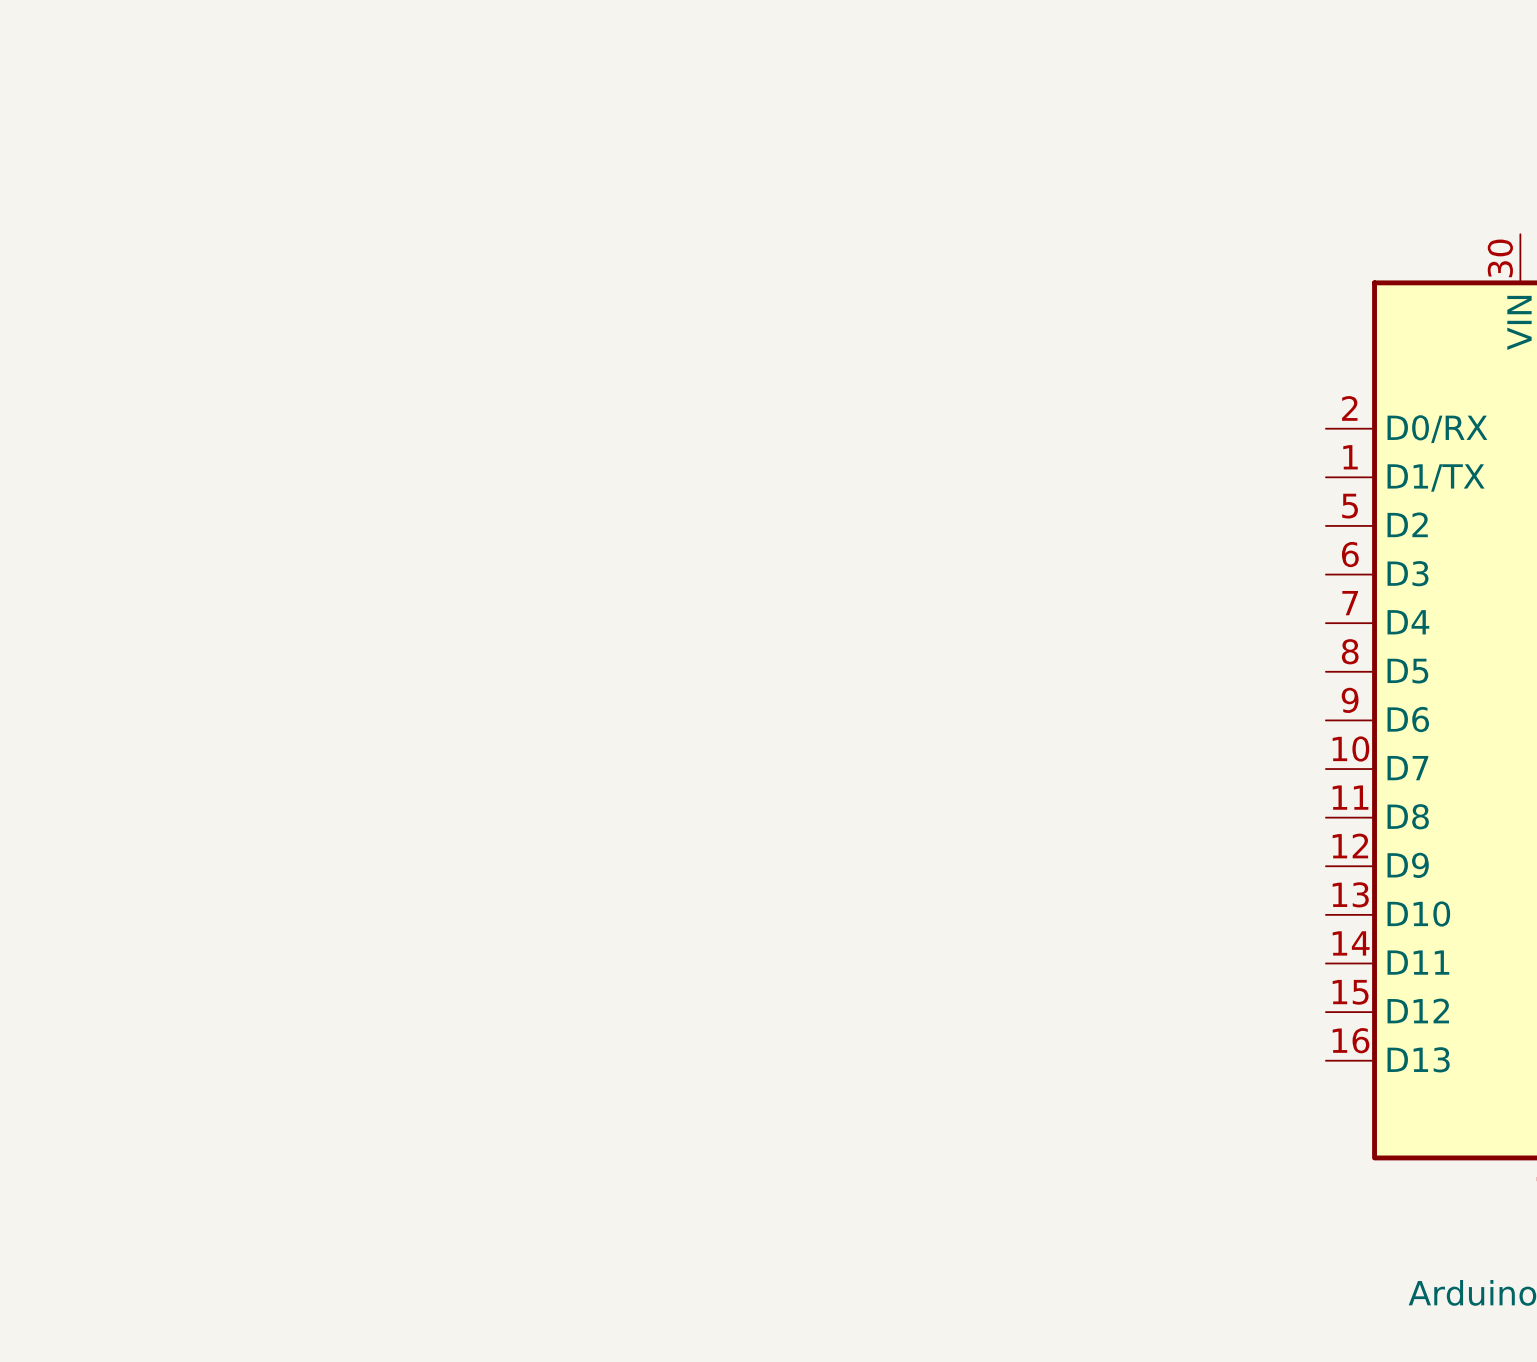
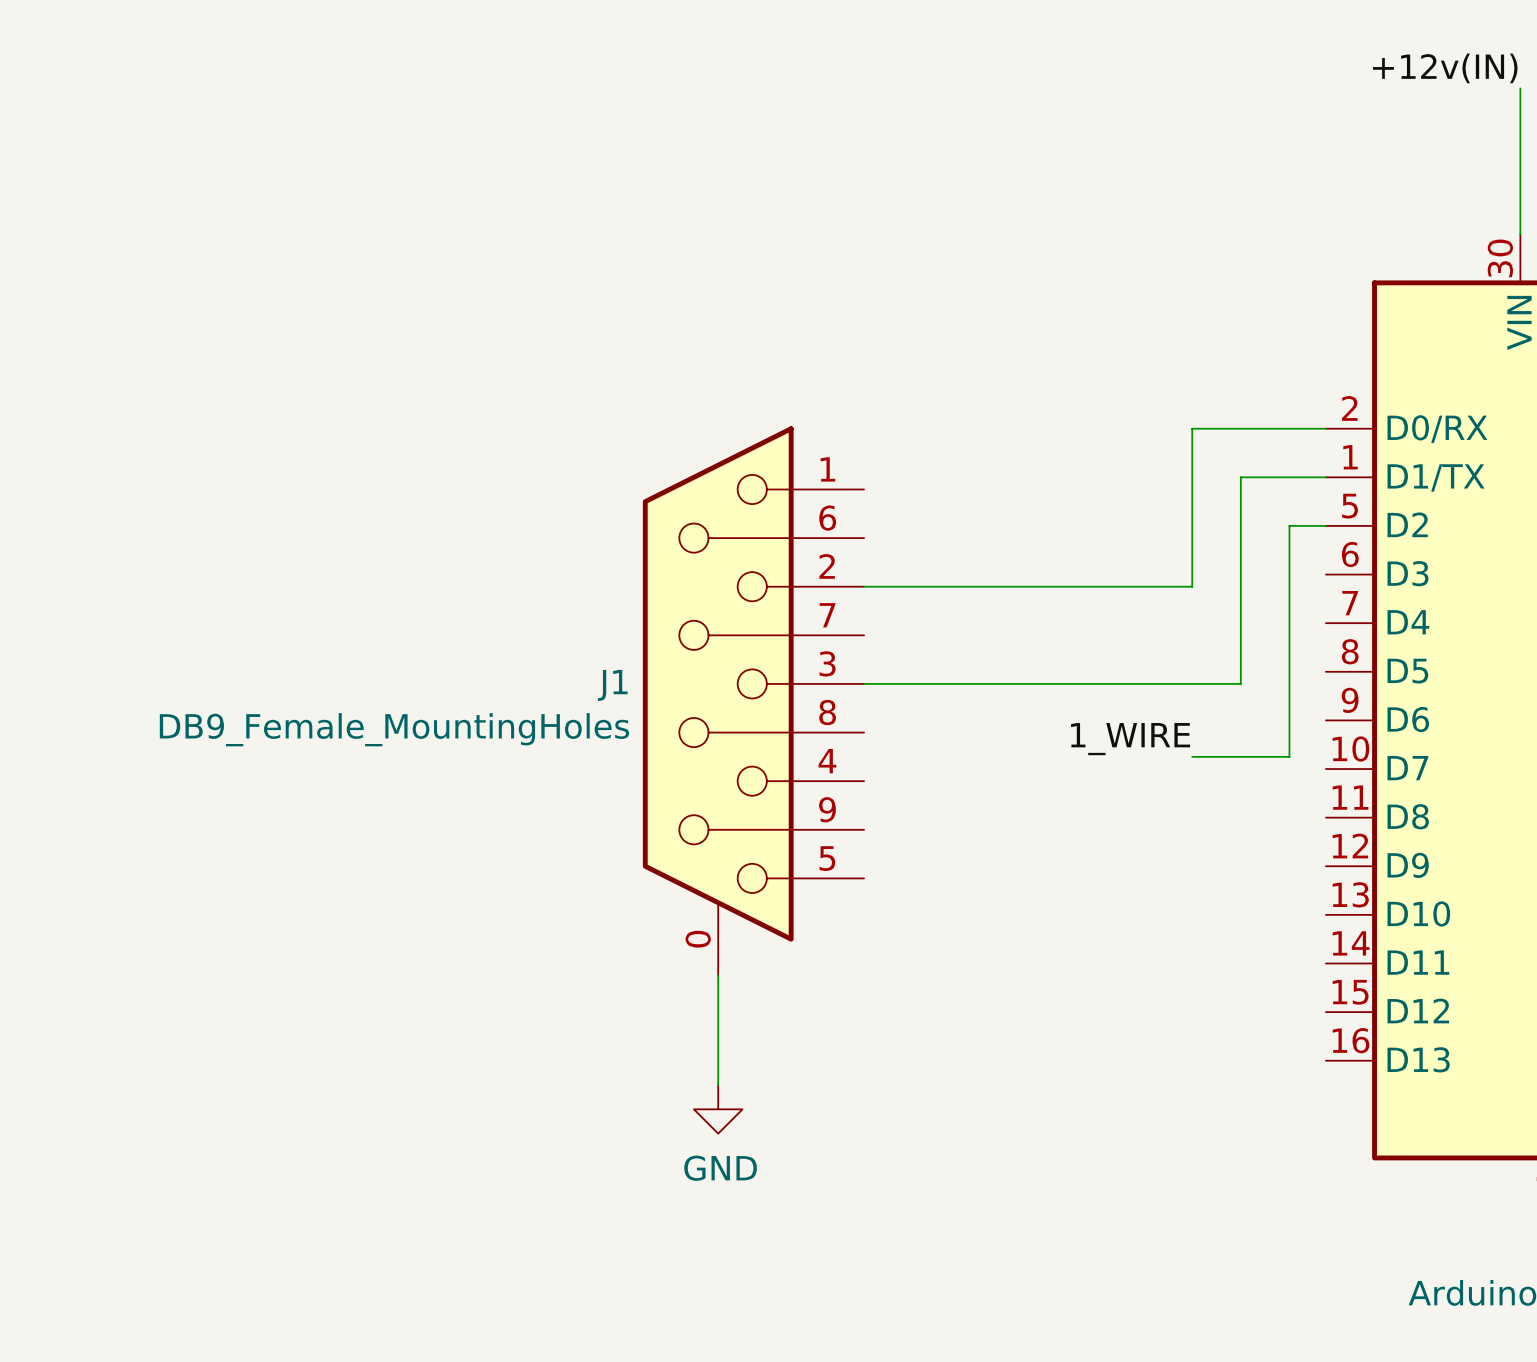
label: none -> +12v(IN) (1445, 68)
wire: none -> (1520, 88) (1520, 234)
wire: none -> (1325, 428) (1192, 428) (1192, 586) (864, 586)
wire: none -> (1325, 477) (1240, 477) (1240, 683) (864, 683)
wire: none -> (1325, 525) (1289, 525) (1289, 756) (1192, 756)
J1: none -> DB9_Female_MountingHoles (753, 700)
label: none -> 1_WIRE (1130, 739)
wire: none -> (718, 975) (718, 1085)
power symbol: none -> GND (718, 1109)

